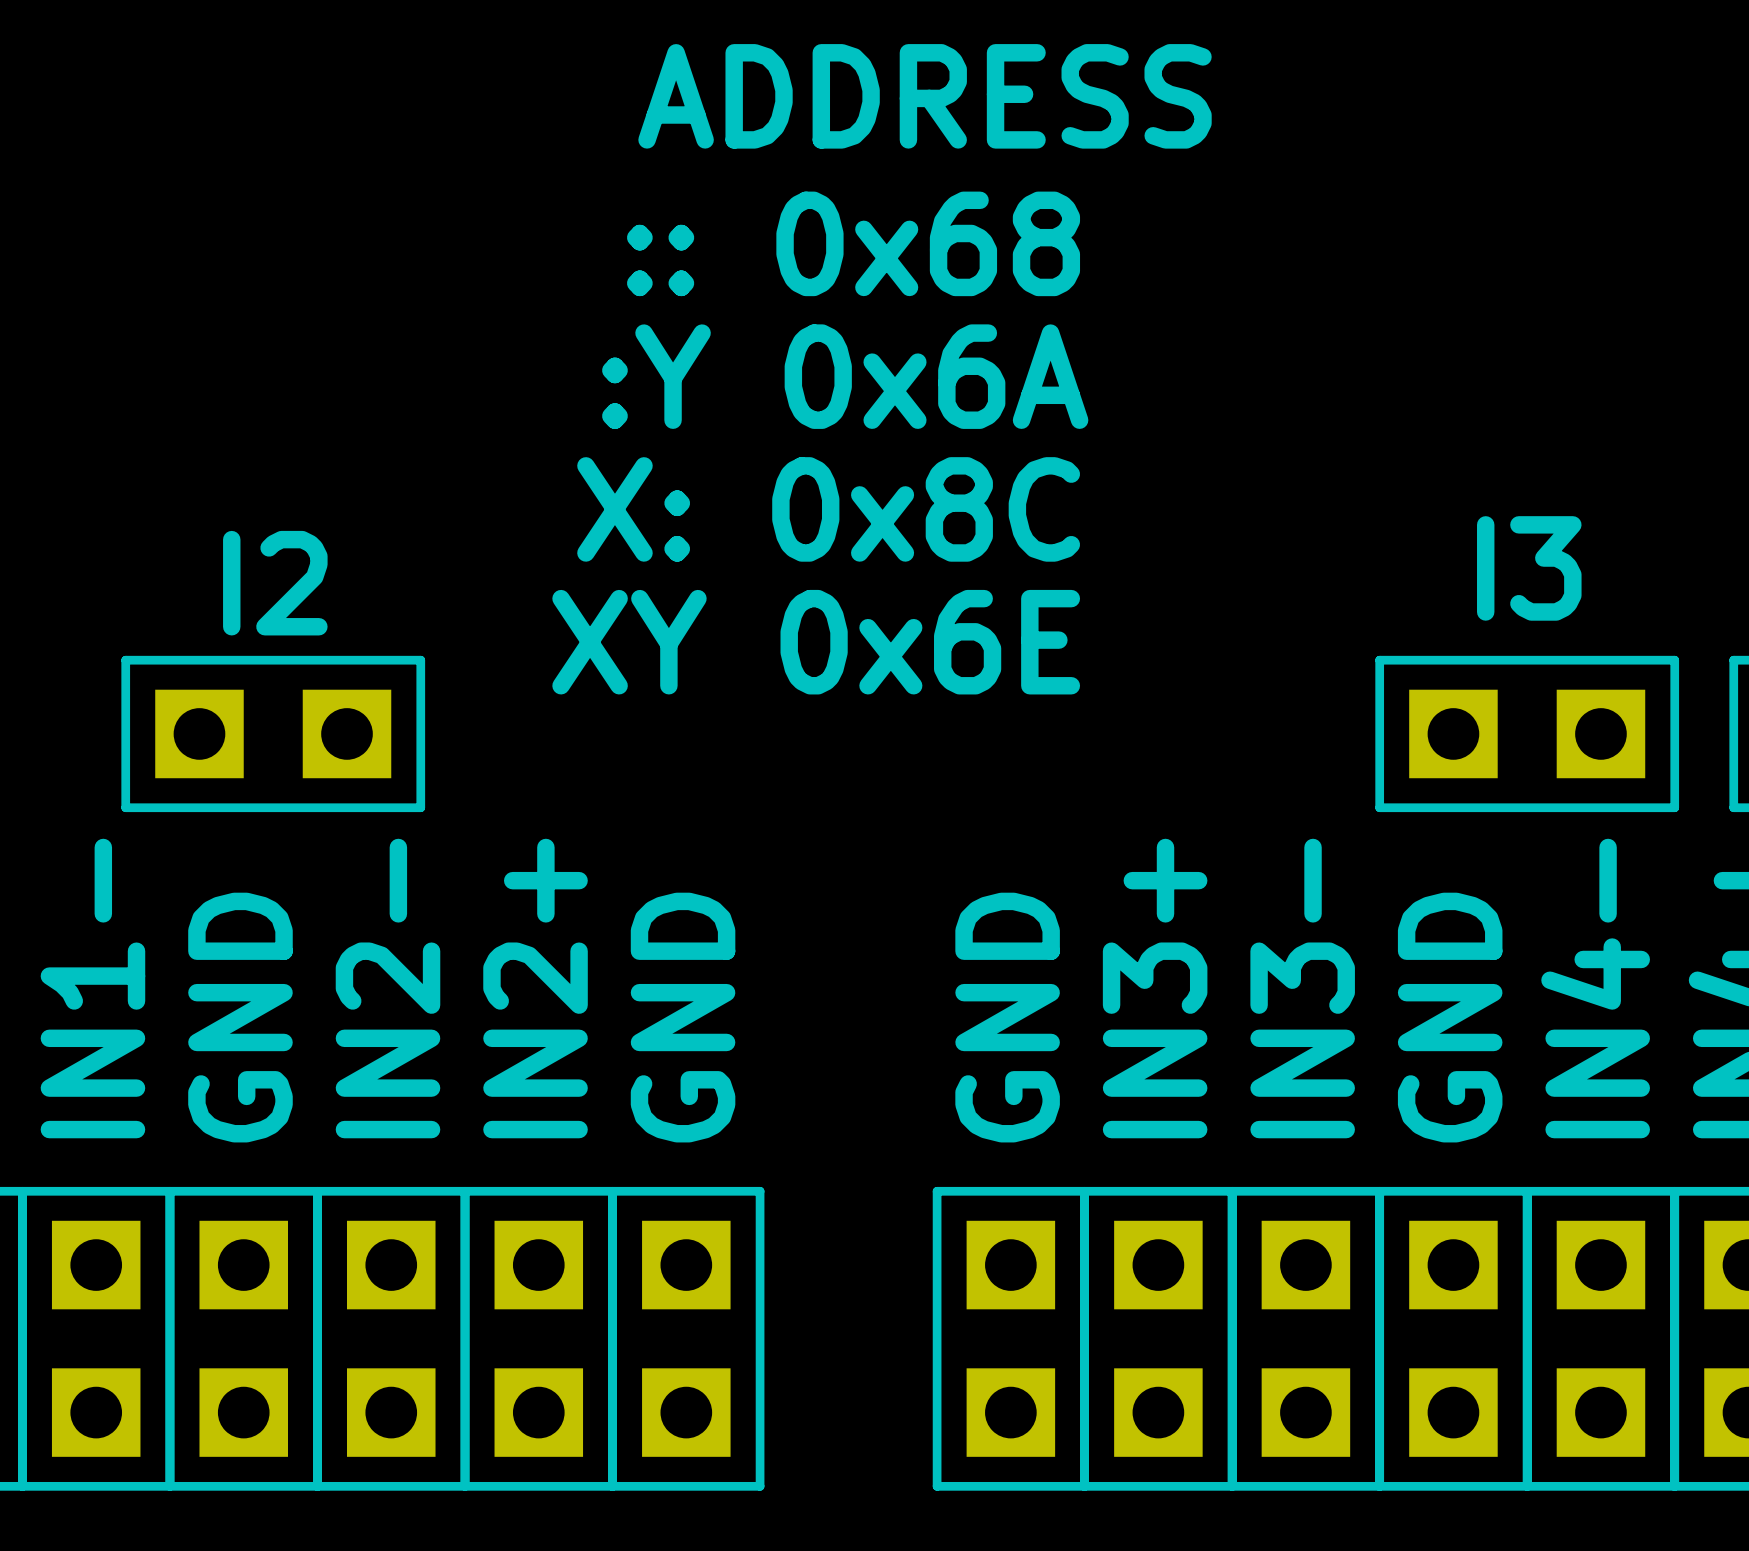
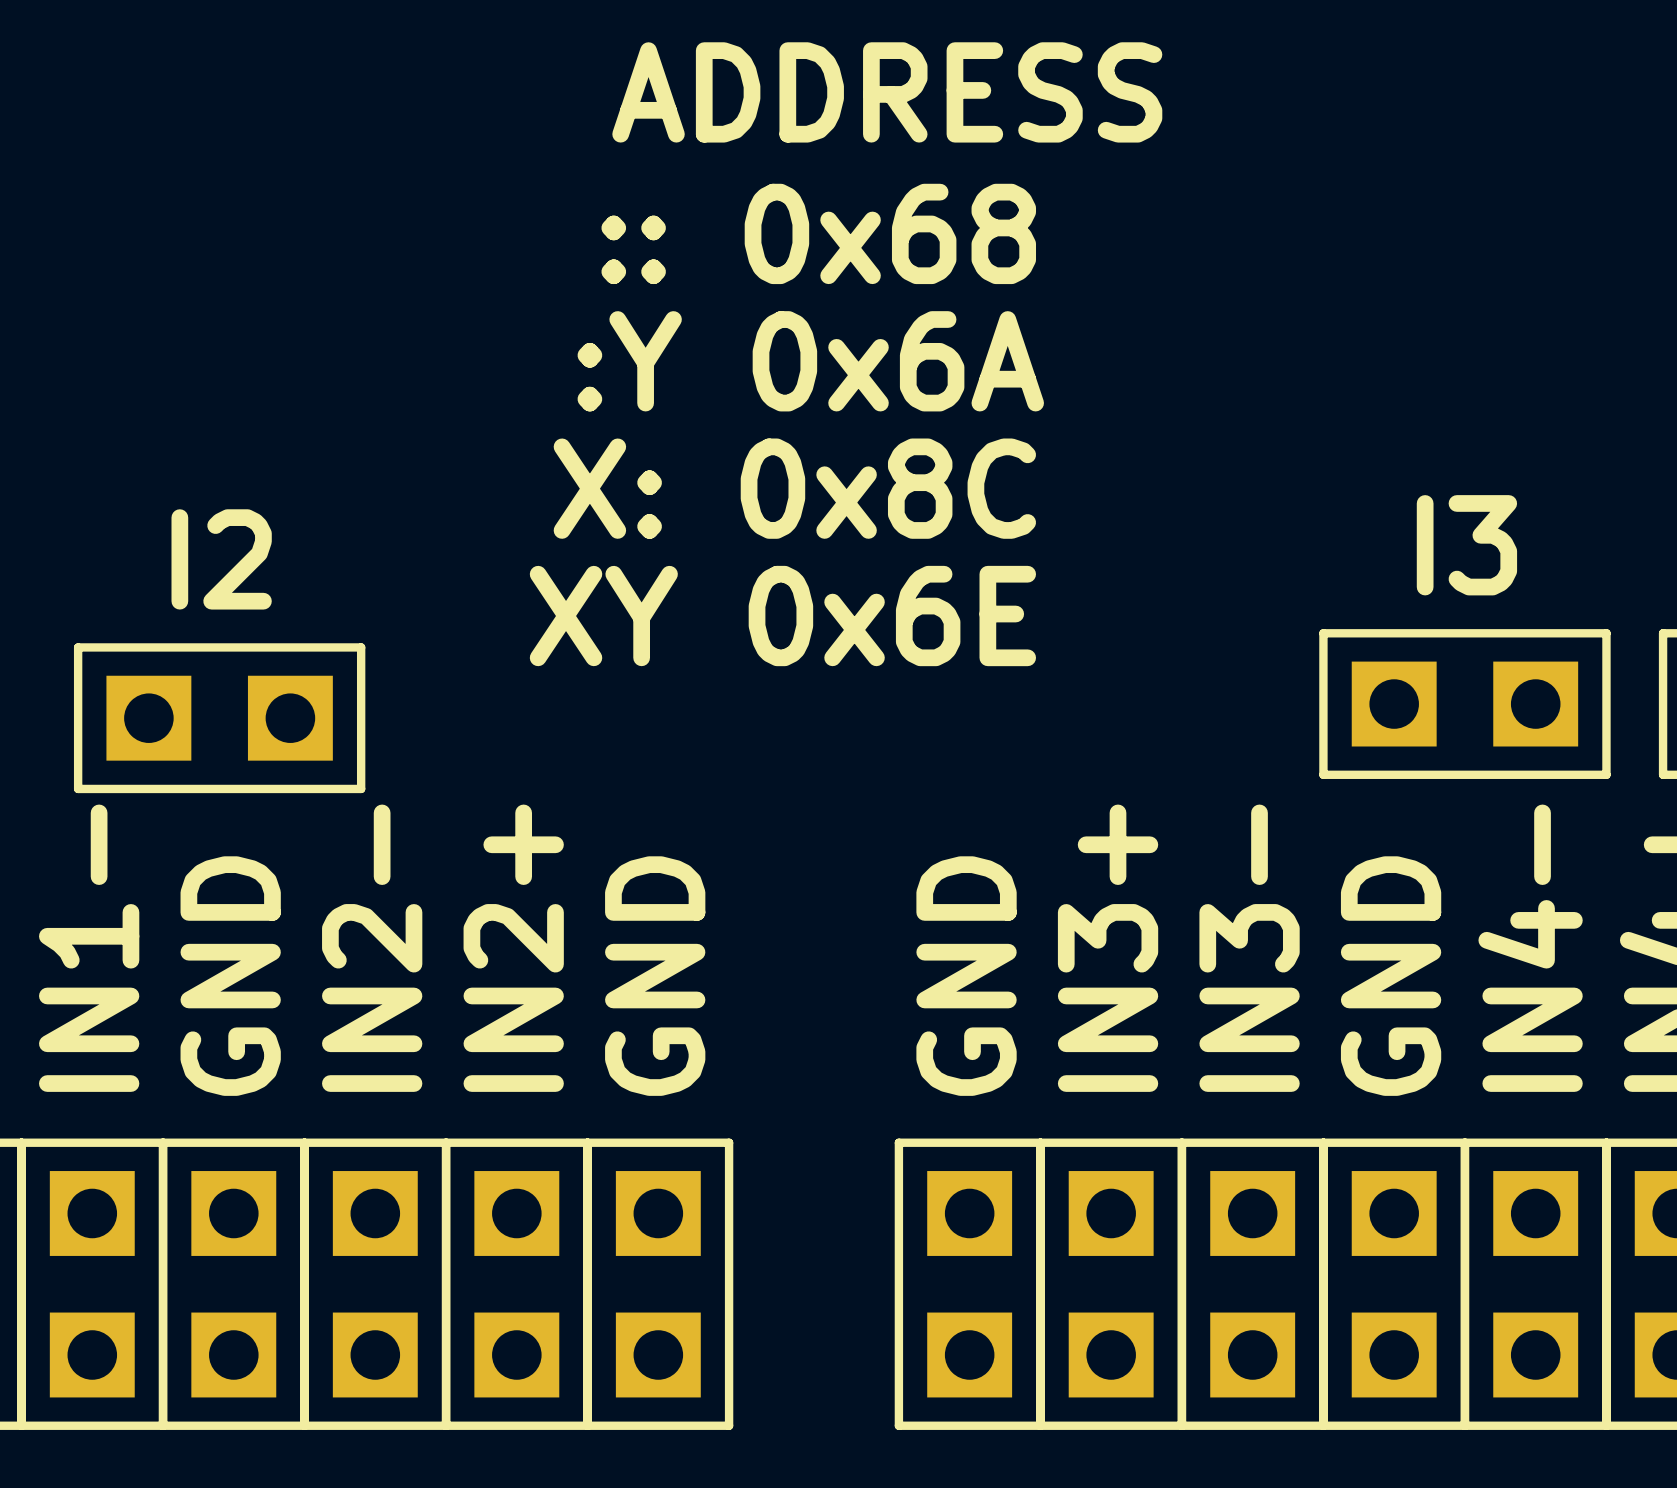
text position: I2 (275, 583) -> I2 (221, 559)
part position: (273, 733) -> (219, 718)

